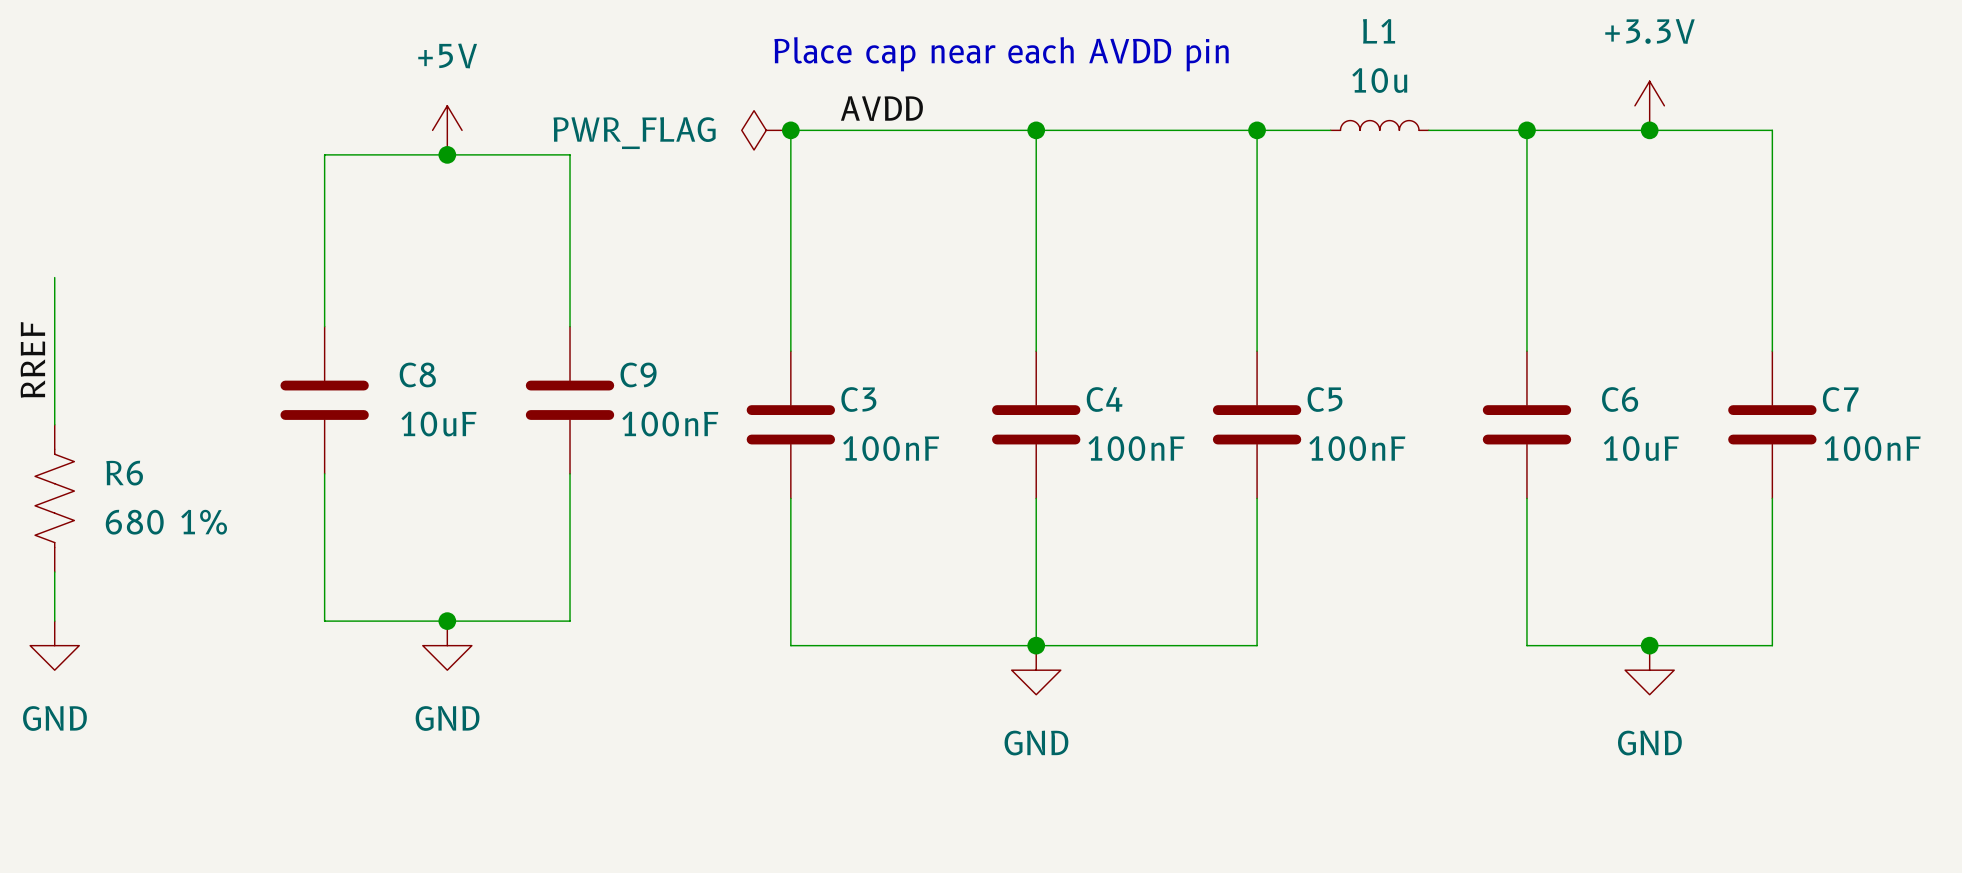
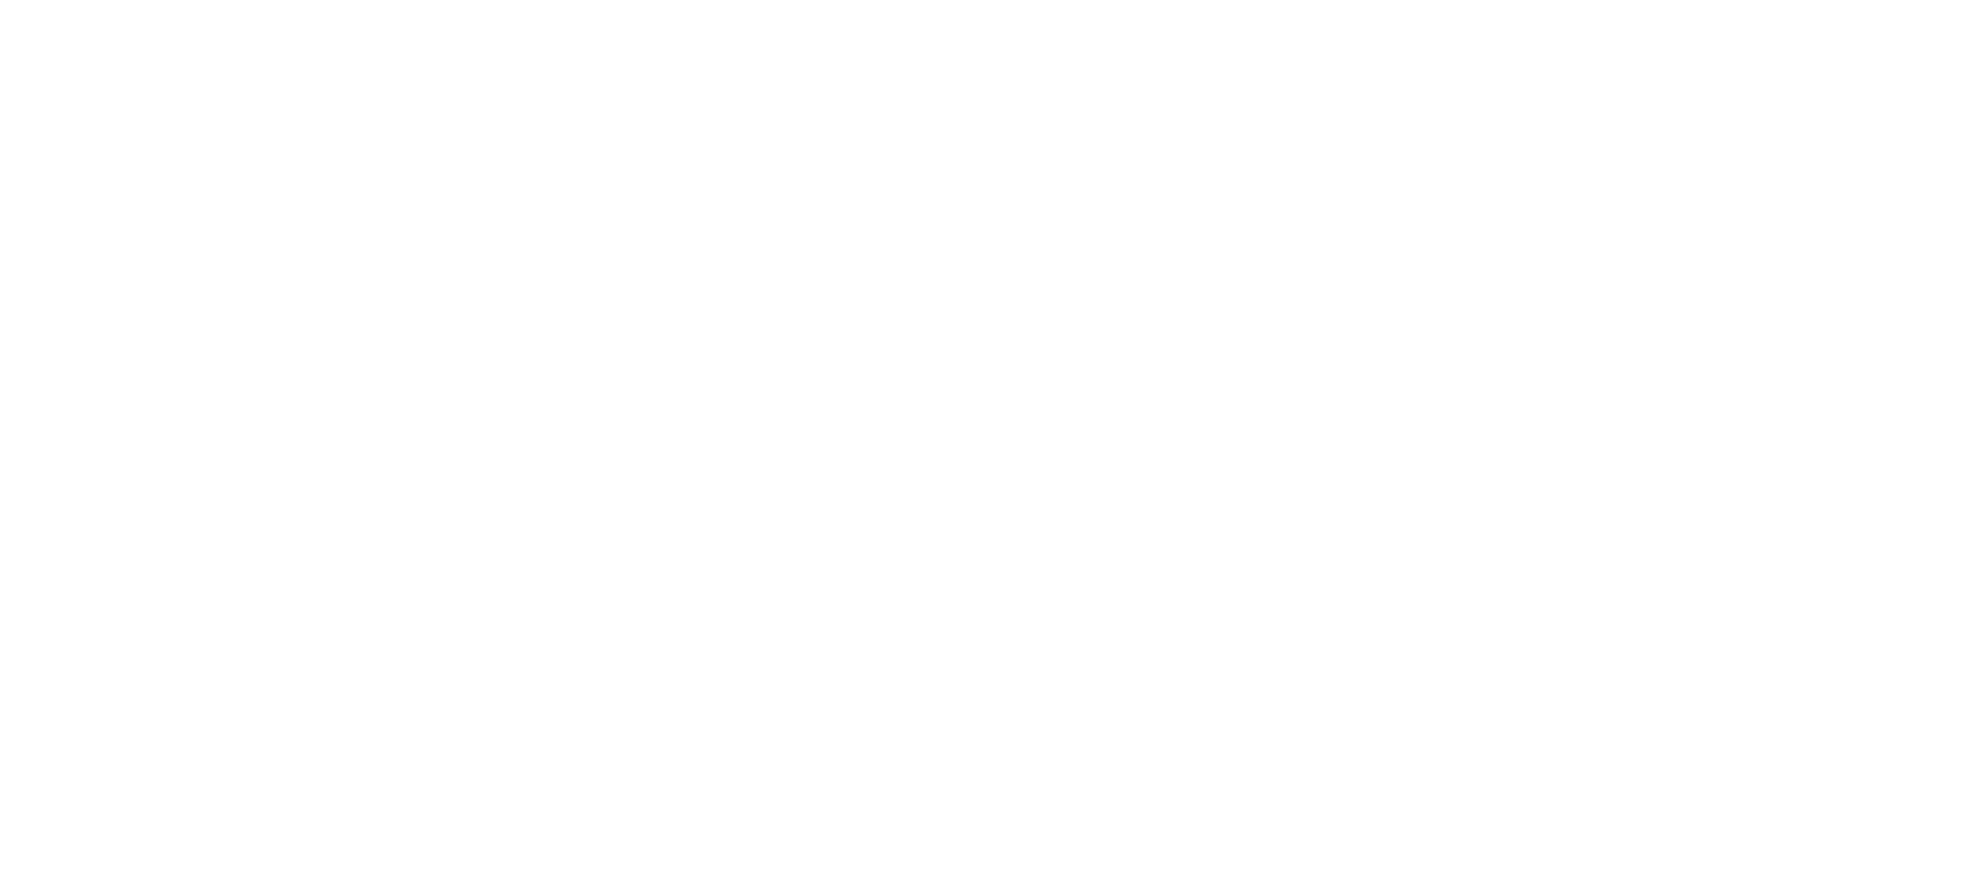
text: Place cap near each AVDD pin (1001, 54) -> none
power symbol: +3.3V (1649, 105) -> none
label: AVDD (881, 108) -> none
L1: 10u (1379, 125) -> none
power symbol: +5V (447, 130) -> none
power symbol: PWR_FLAG (766, 130) -> none
junction: (790, 130) -> none
wire: (1036, 130) (1036, 351) -> none
junction: (1036, 130) -> none
wire: (1257, 130) (1257, 351) -> none
junction: (1257, 130) -> none
wire: (1330, 130) (790, 130) (790, 351) -> none
wire: (1428, 130) (1772, 130) (1772, 351) -> none
wire: (1526, 130) (1526, 351) -> none
junction: (1526, 130) -> none
junction: (1649, 130) -> none
junction: (447, 154) -> none
wire: (54, 277) (54, 424) -> none
wire: (324, 326) (324, 154) (570, 154) (570, 326) -> none
label: RREF (32, 359) -> none
C8: 10uF (324, 400) -> none
C9: 100nF (570, 400) -> none
C3: 100nF (790, 424) -> none
C4: 100nF (1036, 424) -> none
C5: 100nF (1257, 424) -> none
C6: 10uF (1526, 424) -> none
C7: 100nF (1772, 424) -> none
wire: (324, 473) (324, 621) (570, 621) (570, 473) -> none
R6: 680 1% (54, 498) -> none
wire: (790, 498) (790, 645) (1257, 645) (1257, 498) -> none
wire: (1036, 498) (1036, 645) -> none
wire: (1526, 498) (1526, 645) (1772, 645) (1772, 498) -> none
wire: (54, 572) (54, 621) -> none
junction: (447, 621) -> none
power symbol: GND (54, 645) -> none
power symbol: GND (447, 645) -> none
junction: (1036, 645) -> none
junction: (1649, 645) -> none
power symbol: GND (1036, 670) -> none
power symbol: GND (1649, 670) -> none

